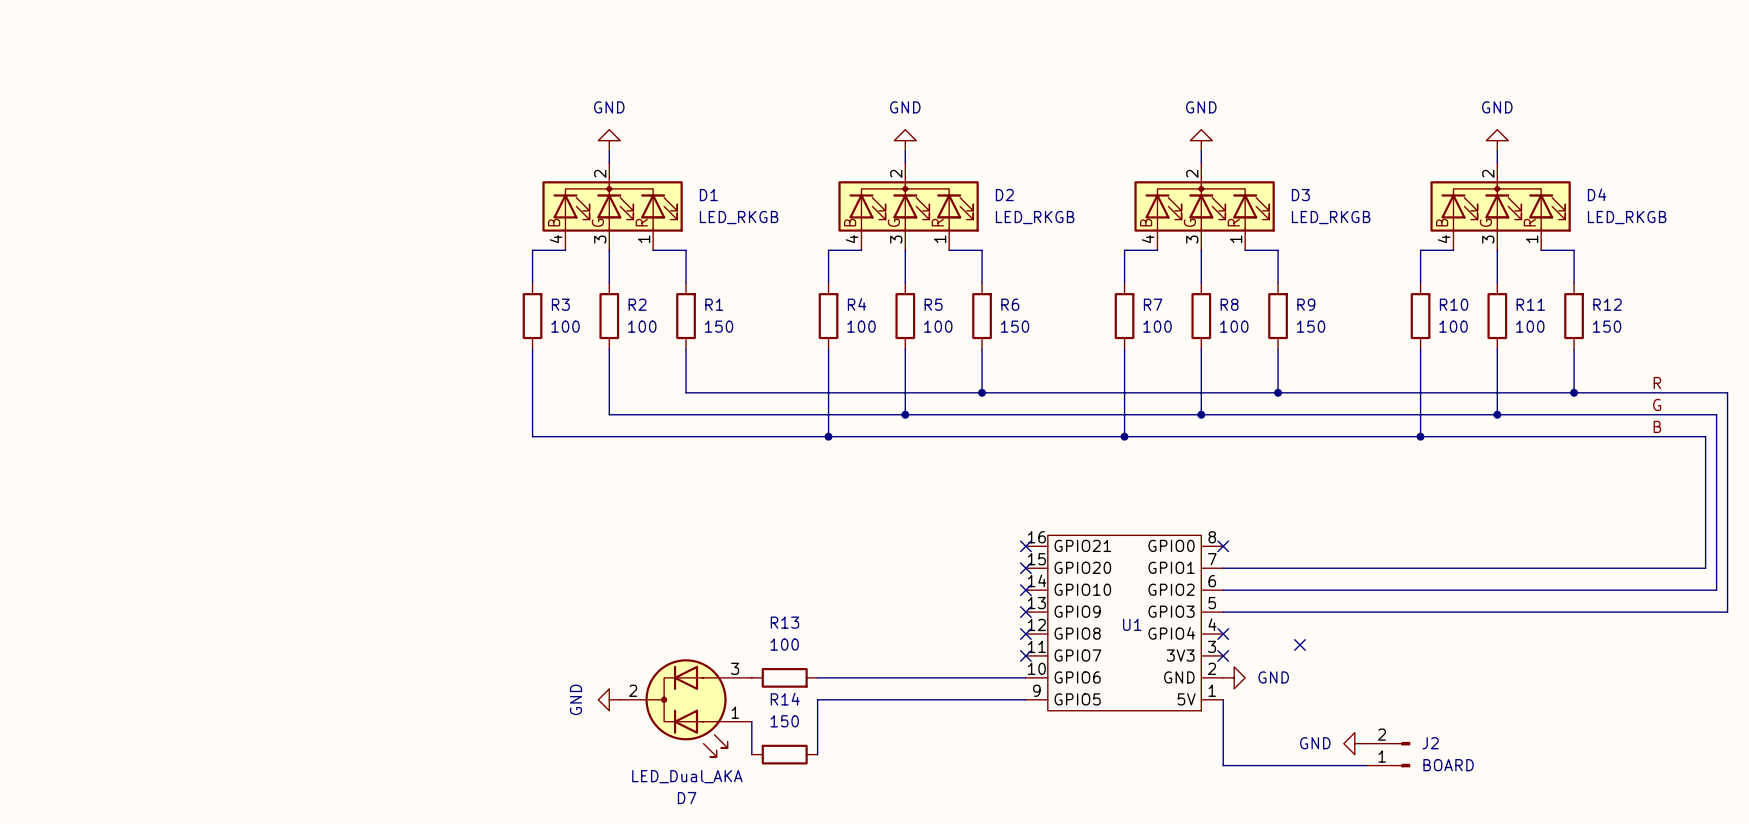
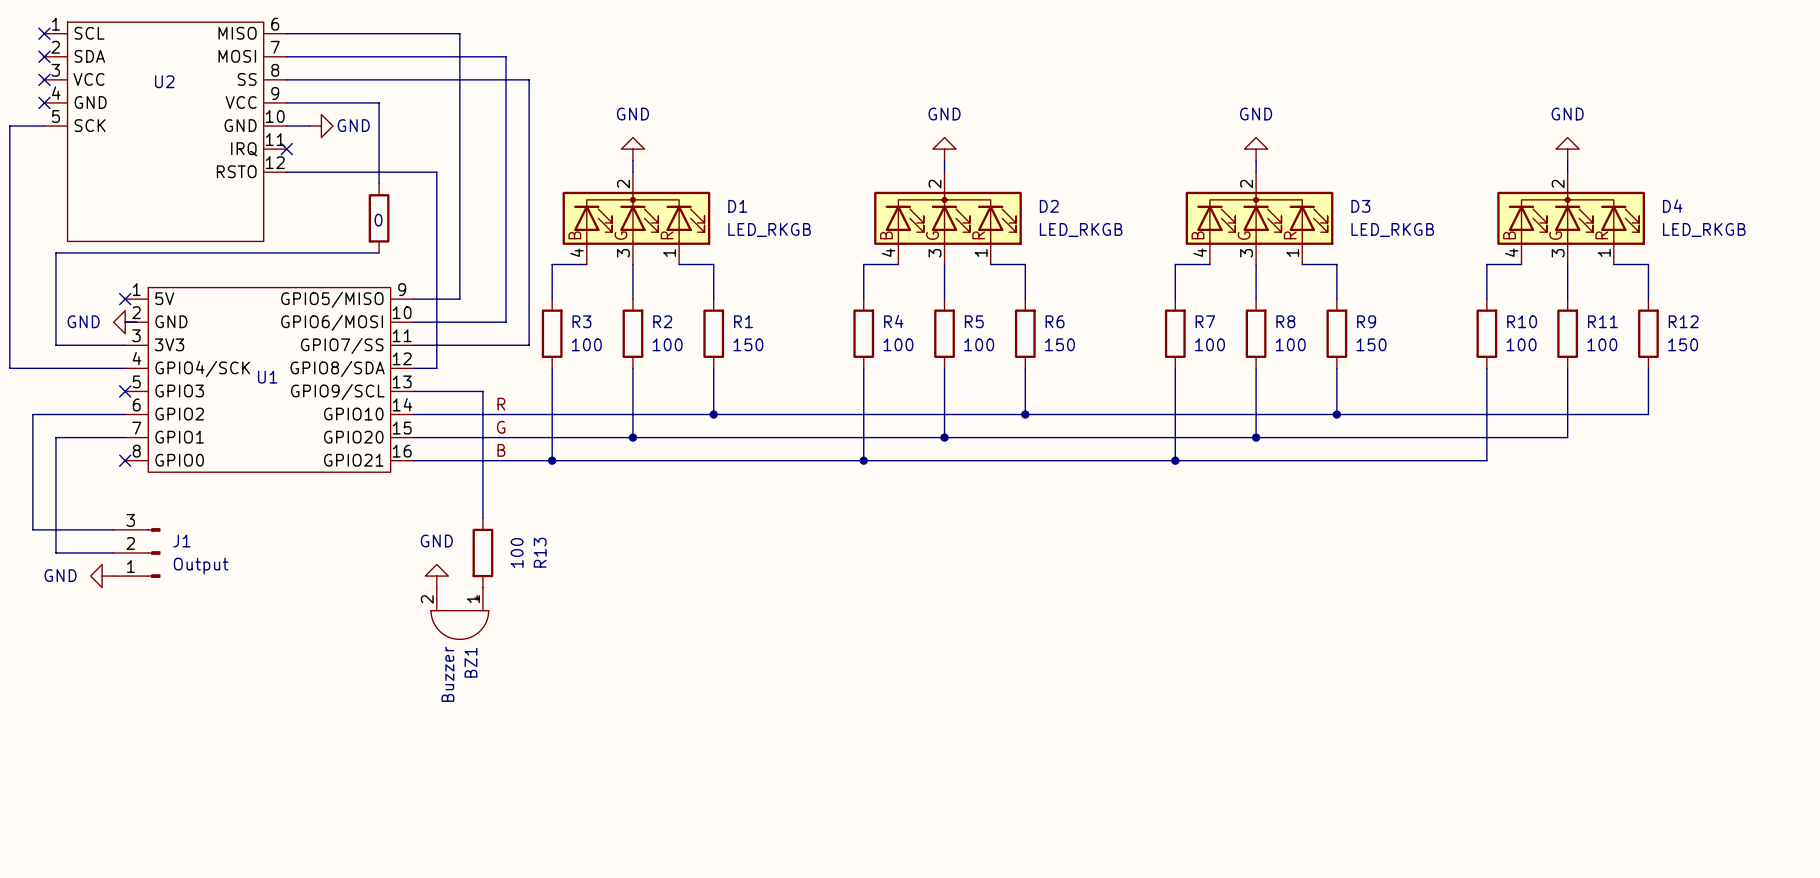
no-connect mark: none -> (44, 33)
wire: none -> (286, 33) (459, 33) (459, 299) (413, 299)
no-connect mark: none -> (44, 56)
wire: none -> (286, 56) (506, 56) (506, 322) (413, 322)
no-connect mark: none -> (44, 79)
wire: none -> (286, 79) (529, 79) (529, 345) (413, 345)
no-connect mark: none -> (44, 102)
wire: none -> (286, 102) (379, 102) (379, 183)
wire: none -> (44, 126) (9, 126) (9, 368) (125, 368)
wire: none -> (286, 126) (309, 126)
power symbol: none -> GND (321, 126)
U2: none -> (165, 131)
no-connect mark: none -> (286, 149)
wire: none -> (286, 172) (436, 172) (436, 368) (413, 368)
part: none -> 0 (379, 218)
wire: none -> (379, 252) (55, 252) (55, 345) (125, 345)
no-connect mark: none -> (125, 299)
wire: none -> (125, 322) (136, 322)
power symbol: none -> GND (125, 322)
no-connect mark: none -> (125, 391)
wire: none -> (413, 391) (482, 391) (482, 518)
label: none -> R (501, 404)
label: R (1657, 383) -> none
wire: none -> (125, 414) (32, 414) (32, 529) (113, 529)
wire: none -> (413, 414) (713, 414)
junction: none -> (713, 414)
wire: (1574, 392) (1727, 392) (1727, 612) (1223, 612) -> none
junction: (1574, 392) -> none
label: none -> G (501, 427)
label: G (1657, 404) -> none
wire: none -> (125, 437) (55, 437) (55, 552) (113, 552)
wire: none -> (413, 437) (632, 437)
junction: none -> (632, 437)
wire: (1497, 414) (1716, 414) (1716, 590) (1223, 590) -> none
junction: (1497, 414) -> none
label: none -> B (501, 450)
label: B (1657, 426) -> none
no-connect mark: none -> (125, 460)
wire: none -> (413, 460) (552, 460)
junction: none -> (552, 460)
wire: (1420, 436) (1705, 436) (1705, 568) (1223, 568) -> none
junction: (1420, 436) -> none
J1: none -> Output (137, 552)
U1 symbol: [1025, 535, 1224, 711] -> [125, 287, 414, 473]
power symbol: none -> GND (102, 576)
power symbol: none -> GND (436, 576)
no-connect mark: (1025, 546) -> none
no-connect mark: (1223, 546) -> none
no-connect mark: (1025, 568) -> none
BZ1: none -> Buzzer (459, 613)
no-connect mark: (1025, 590) -> none
no-connect mark: (1025, 612) -> none
no-connect mark: (1025, 634) -> none
no-connect mark: (1223, 634) -> none
no-connect mark: (1299, 644) -> none
no-connect mark: (1025, 655) -> none
no-connect mark: (1223, 655) -> none
R13 rotation: 0° (784, 677) -> 90° clockwise (482, 552)
R13 position: (784, 677) -> (482, 552)
wire: (817, 677) (1025, 677) -> none
power symbol: GND (1234, 677) -> none
power symbol: GND (609, 699) -> none
wire: (1025, 699) (817, 699) (817, 754) -> none
wire: (1223, 699) (1223, 765) (1365, 765) -> none
D7: LED_Dual_AKA (686, 708) -> none
wire: (751, 721) (751, 754) -> none
power symbol: GND (1354, 743) -> none
R14: 150 (784, 754) -> none
J2: BOARD (1388, 754) -> none

